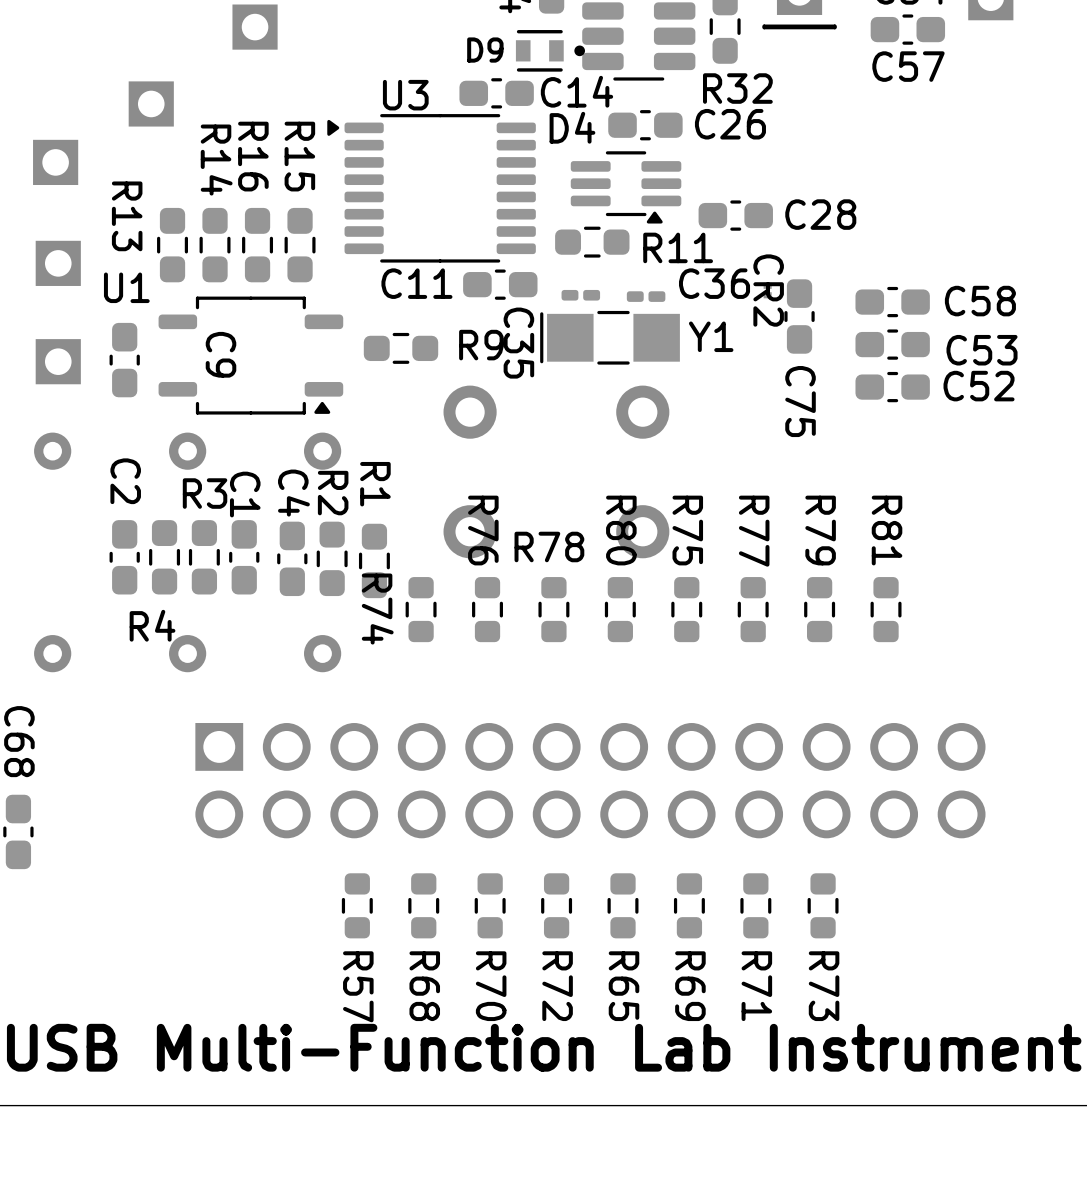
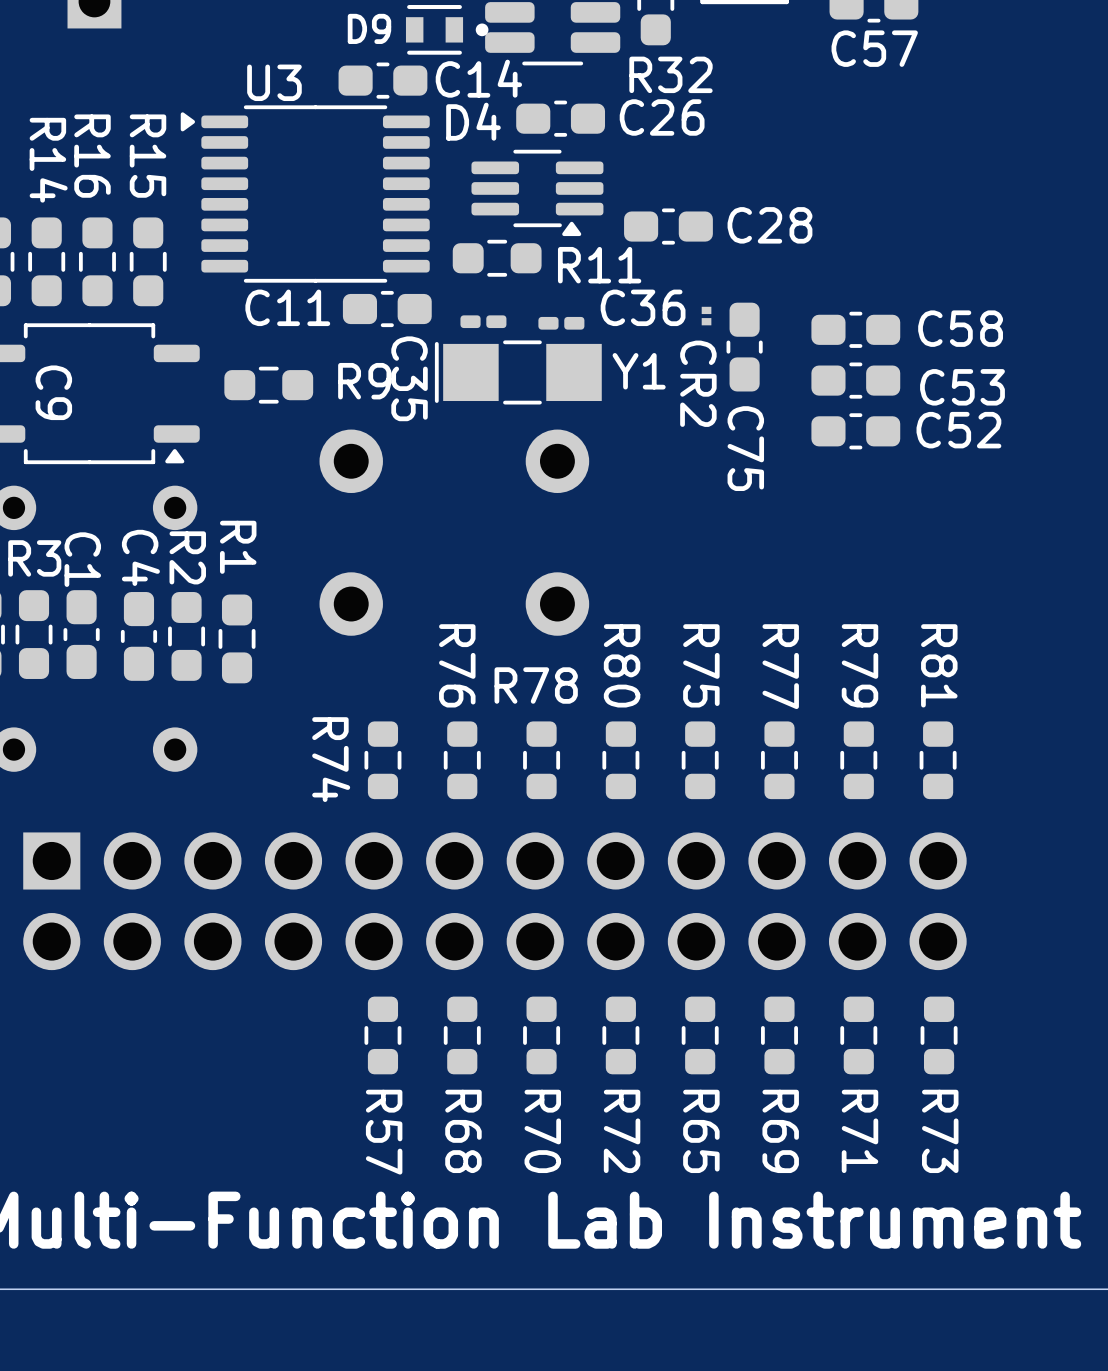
CR2 name position: CR2 (768, 290) -> CR2 (698, 383)
R74 position: (421, 609) -> (382, 760)
R76 position: (487, 609) -> (462, 760)
R78 position: (553, 609) -> (541, 760)
R80 position: (620, 609) -> (620, 760)
R75 position: (686, 609) -> (700, 760)
R77 position: (753, 609) -> (779, 760)
R79 position: (819, 609) -> (858, 760)
R81 position: (886, 609) -> (938, 760)
R57 position: (357, 905) -> (382, 1035)
R68 position: (423, 905) -> (462, 1035)
R70 position: (490, 905) -> (541, 1035)
R72 position: (556, 905) -> (620, 1035)
R65 position: (623, 905) -> (700, 1035)
R69 position: (689, 905) -> (779, 1035)
R71 position: (755, 905) -> (858, 1035)
R73 position: (823, 905) -> (939, 1035)

